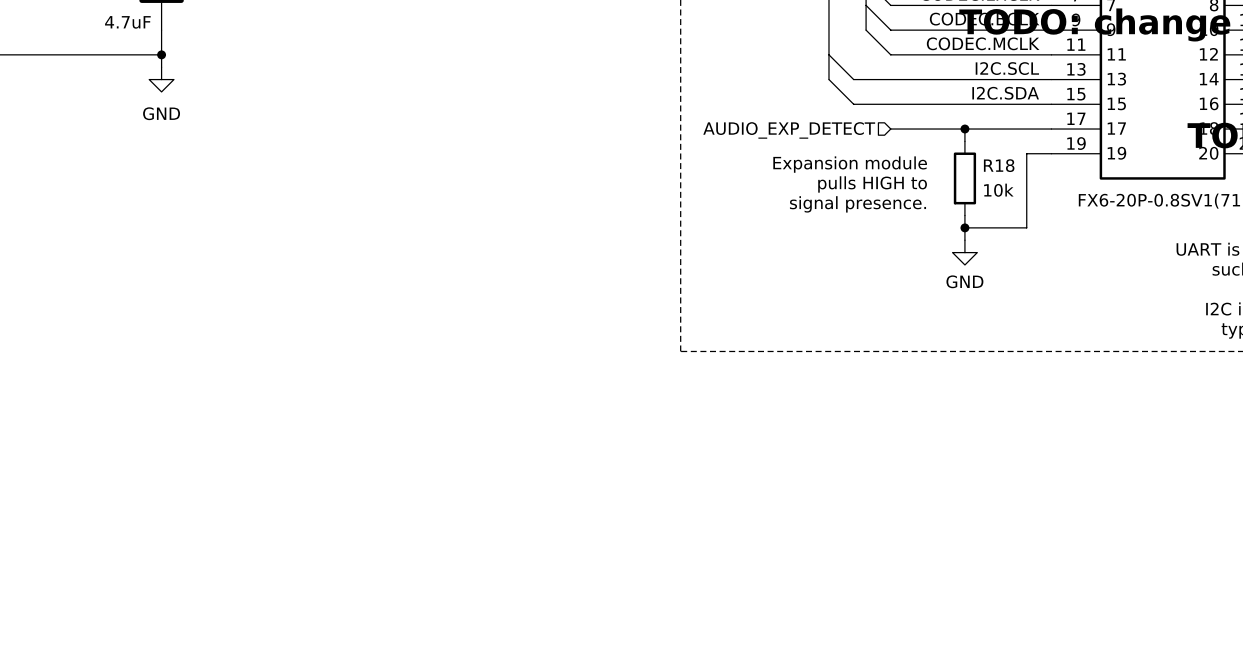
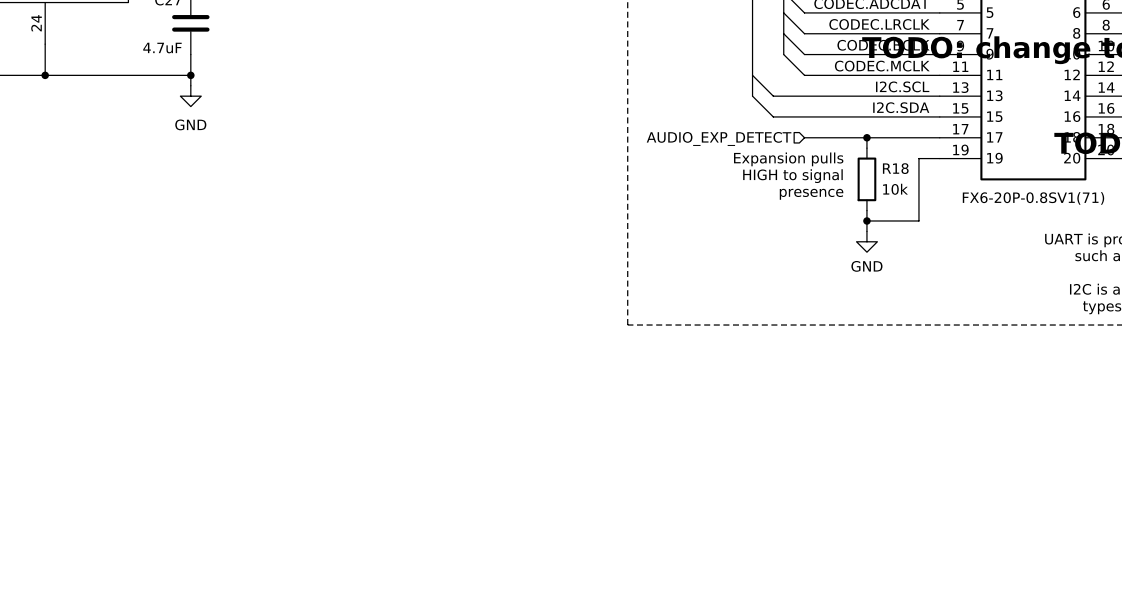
text: Expansion module (850, 164) -> Expansion pulls (788, 159)
text: none -> HIGH to signal (792, 176)
text: pulls HIGH to (872, 184) -> none
text: signal presence. (857, 204) -> presence (811, 194)

